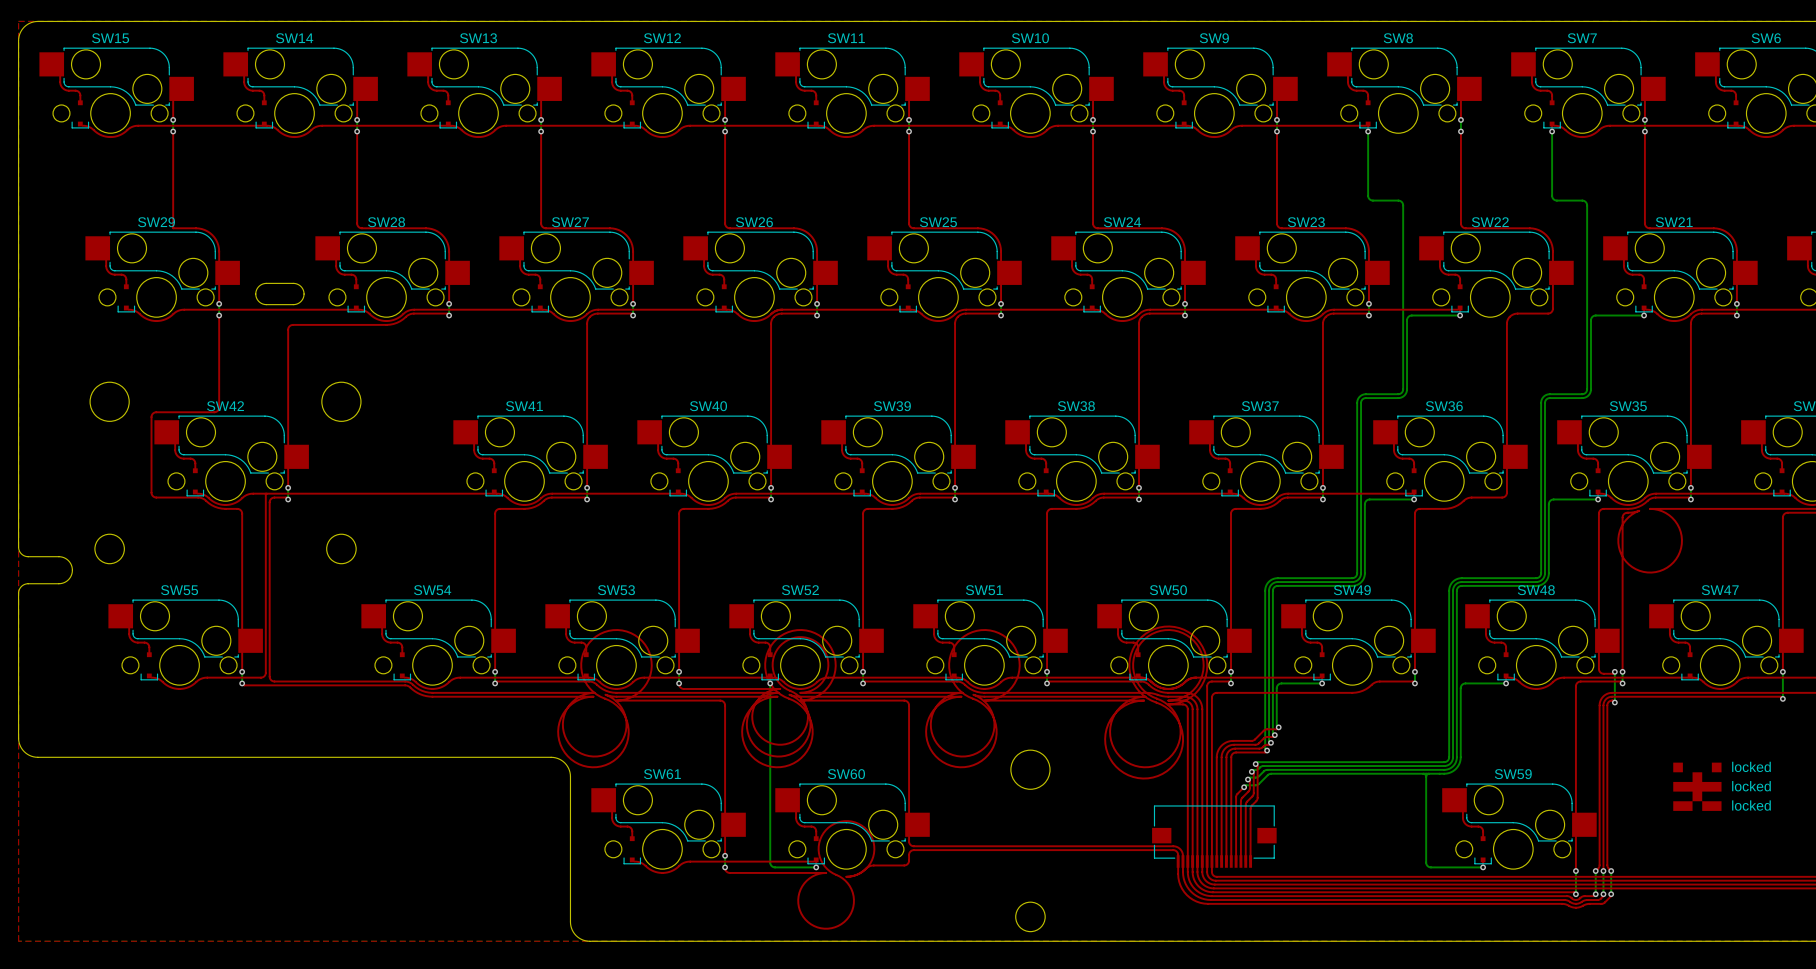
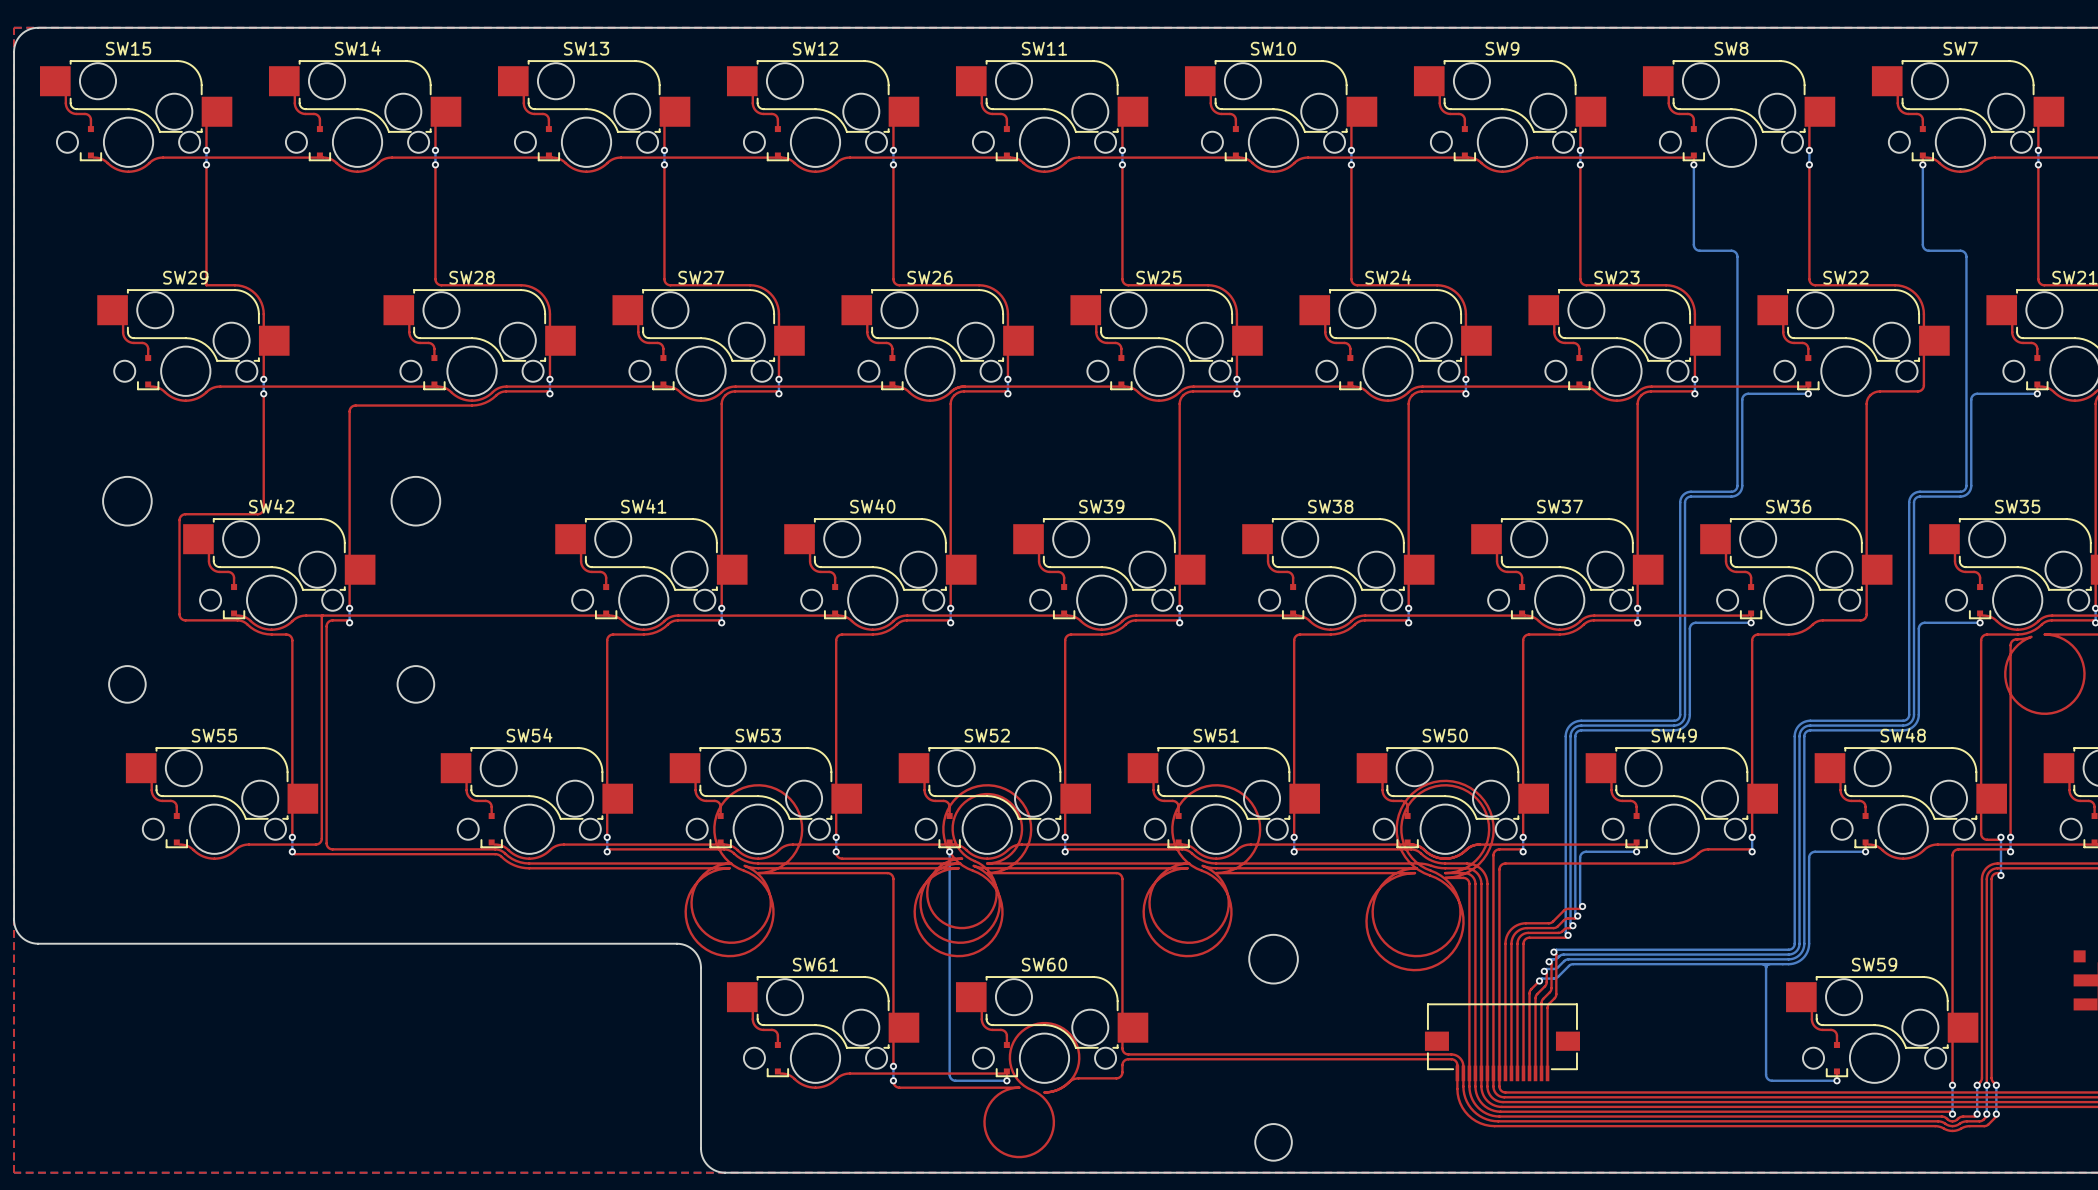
board edge: (266, 283) (297, 284) (303, 289) (303, 298) (294, 304) (262, 303) (257, 299) (255, 292) (258, 286) (266, 283) -> none
board edge: (18, 547) (20, 553) (26, 556) (64, 557) (69, 561) (72, 570) (70, 576) (64, 582) (26, 583) (20, 587) (18, 593) -> (14, 681) (14, 739)

